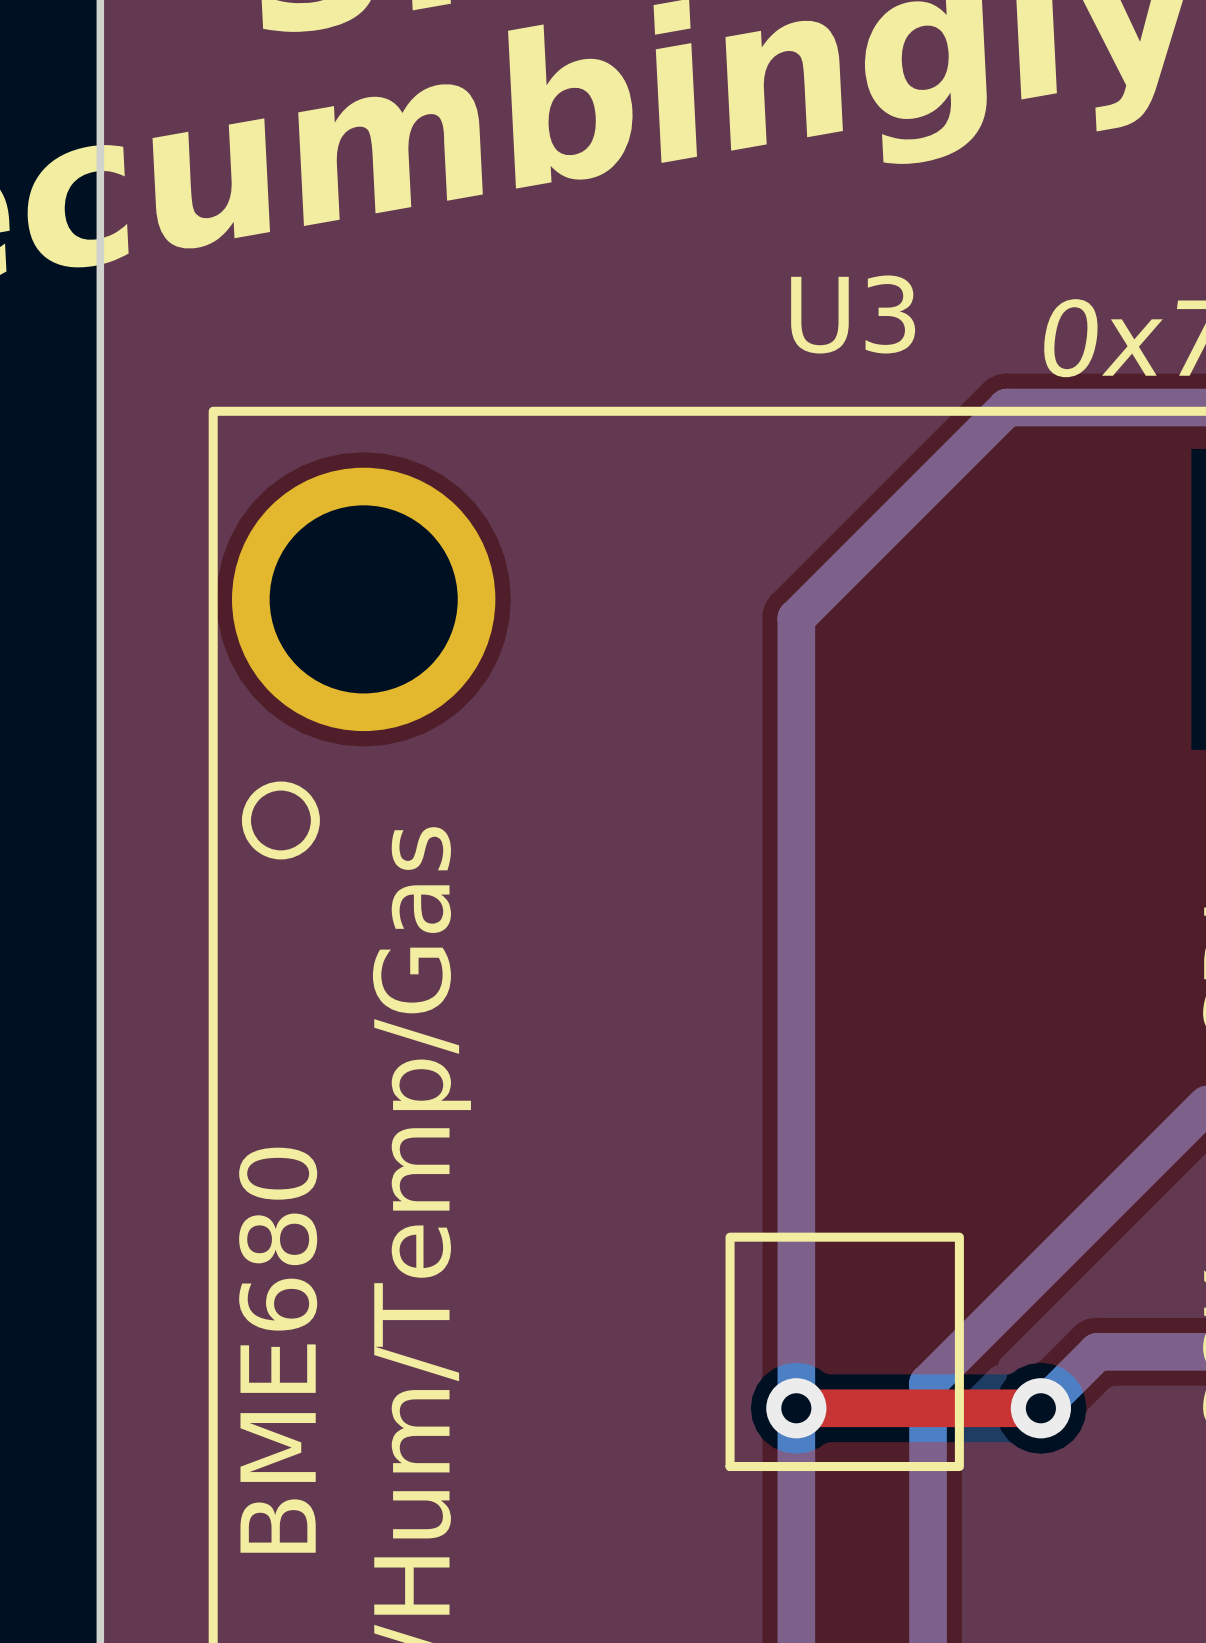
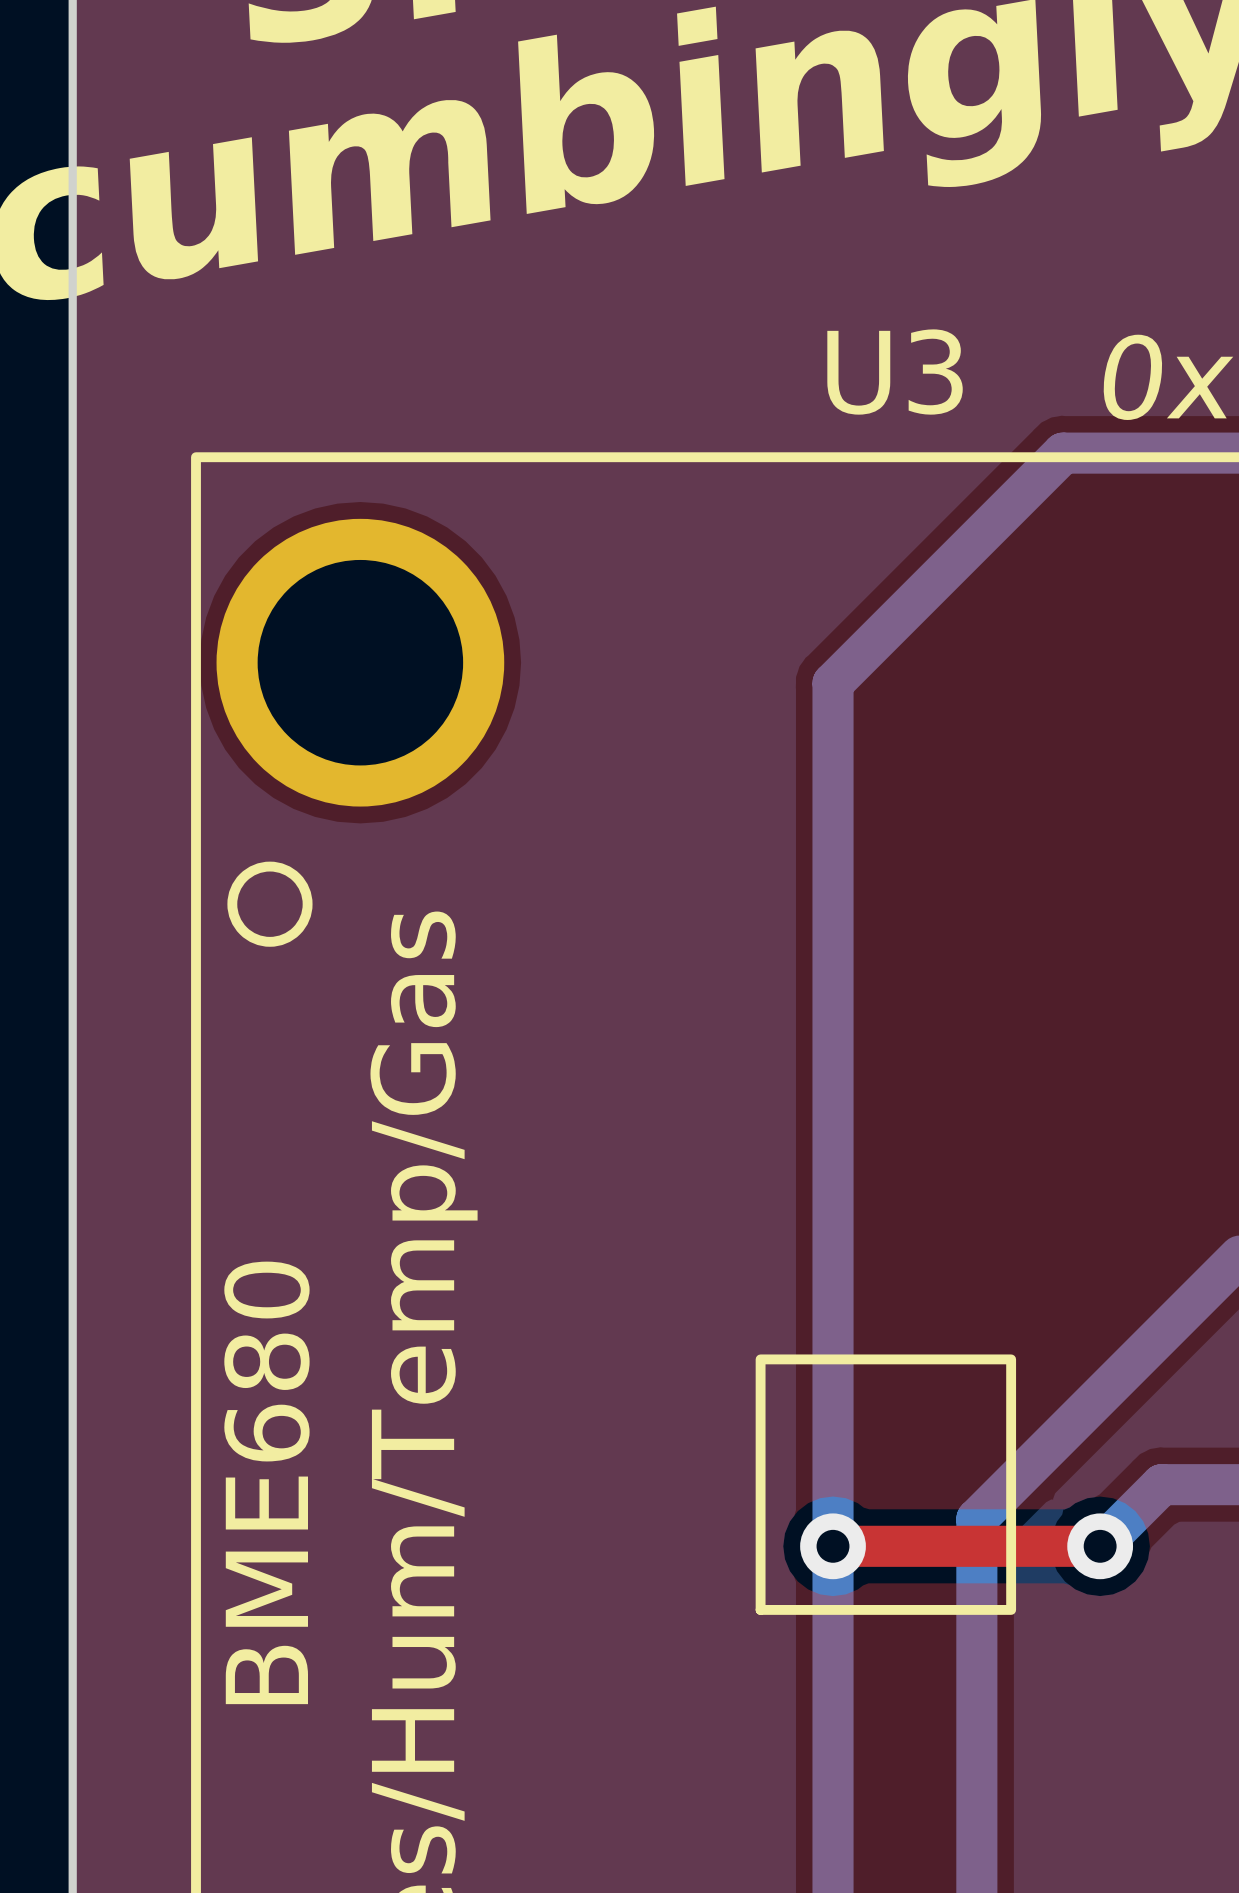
U3 name position: U3 (853, 314) -> U3 (895, 372)

